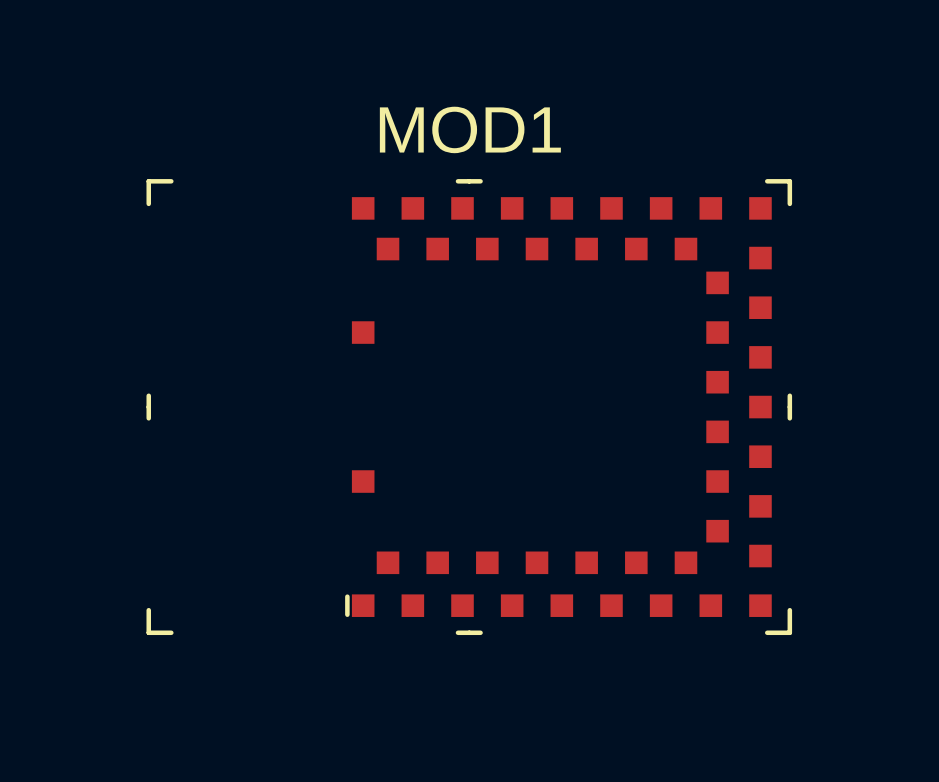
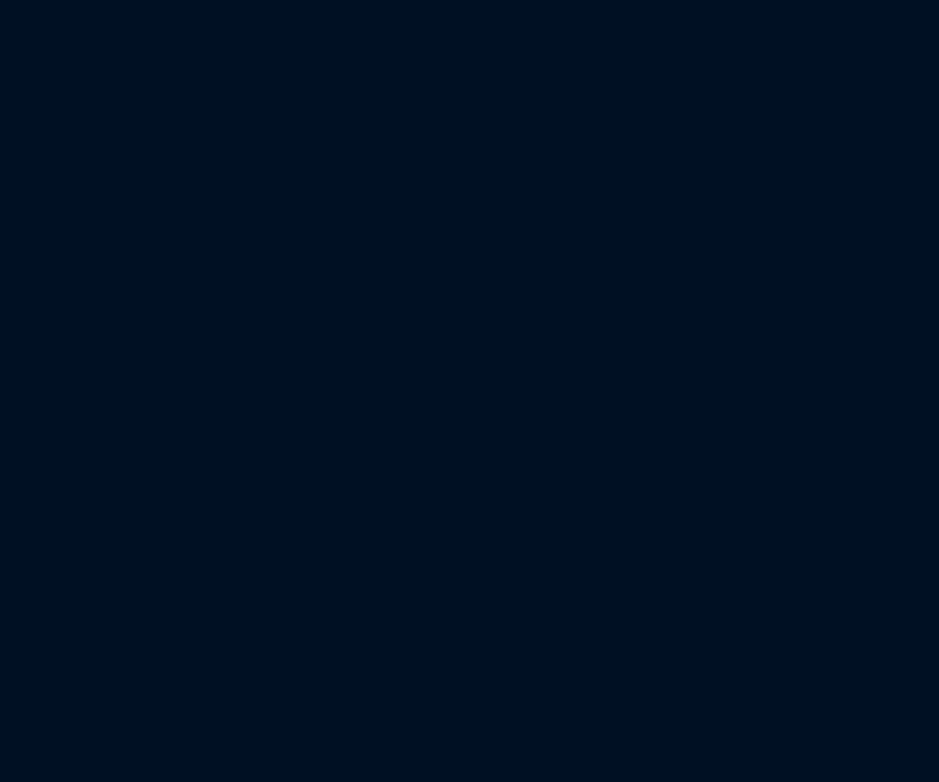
MOD1: (469, 407) -> none

